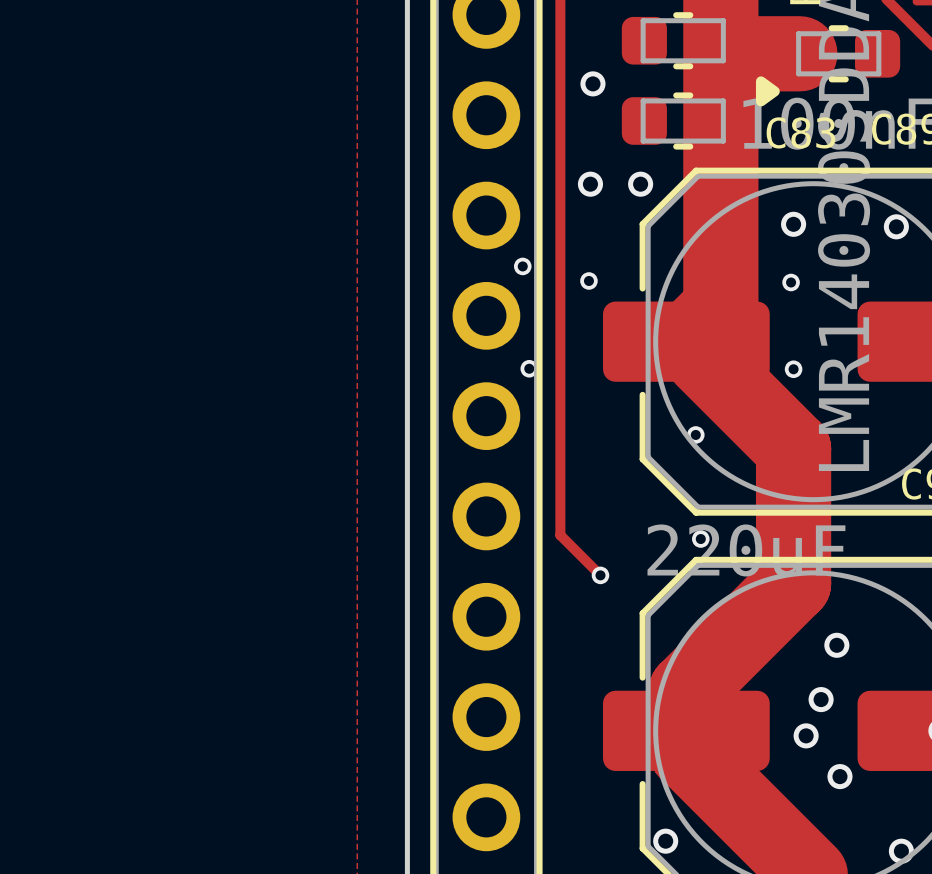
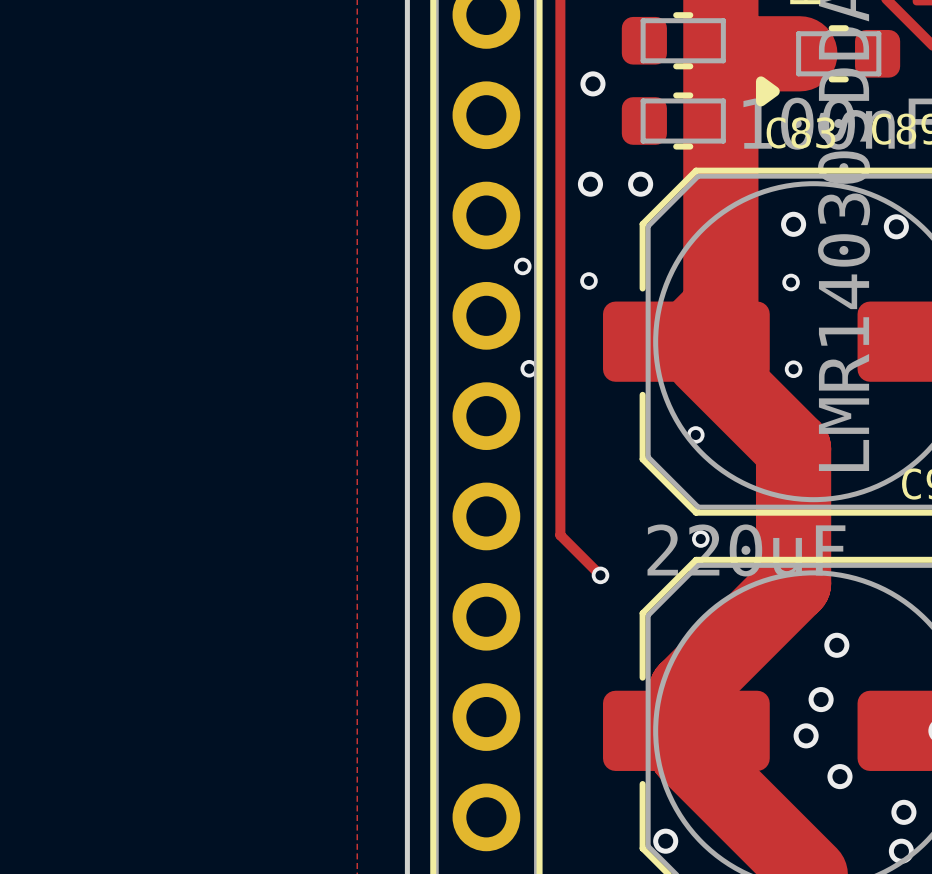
via: none -> (903, 812)

